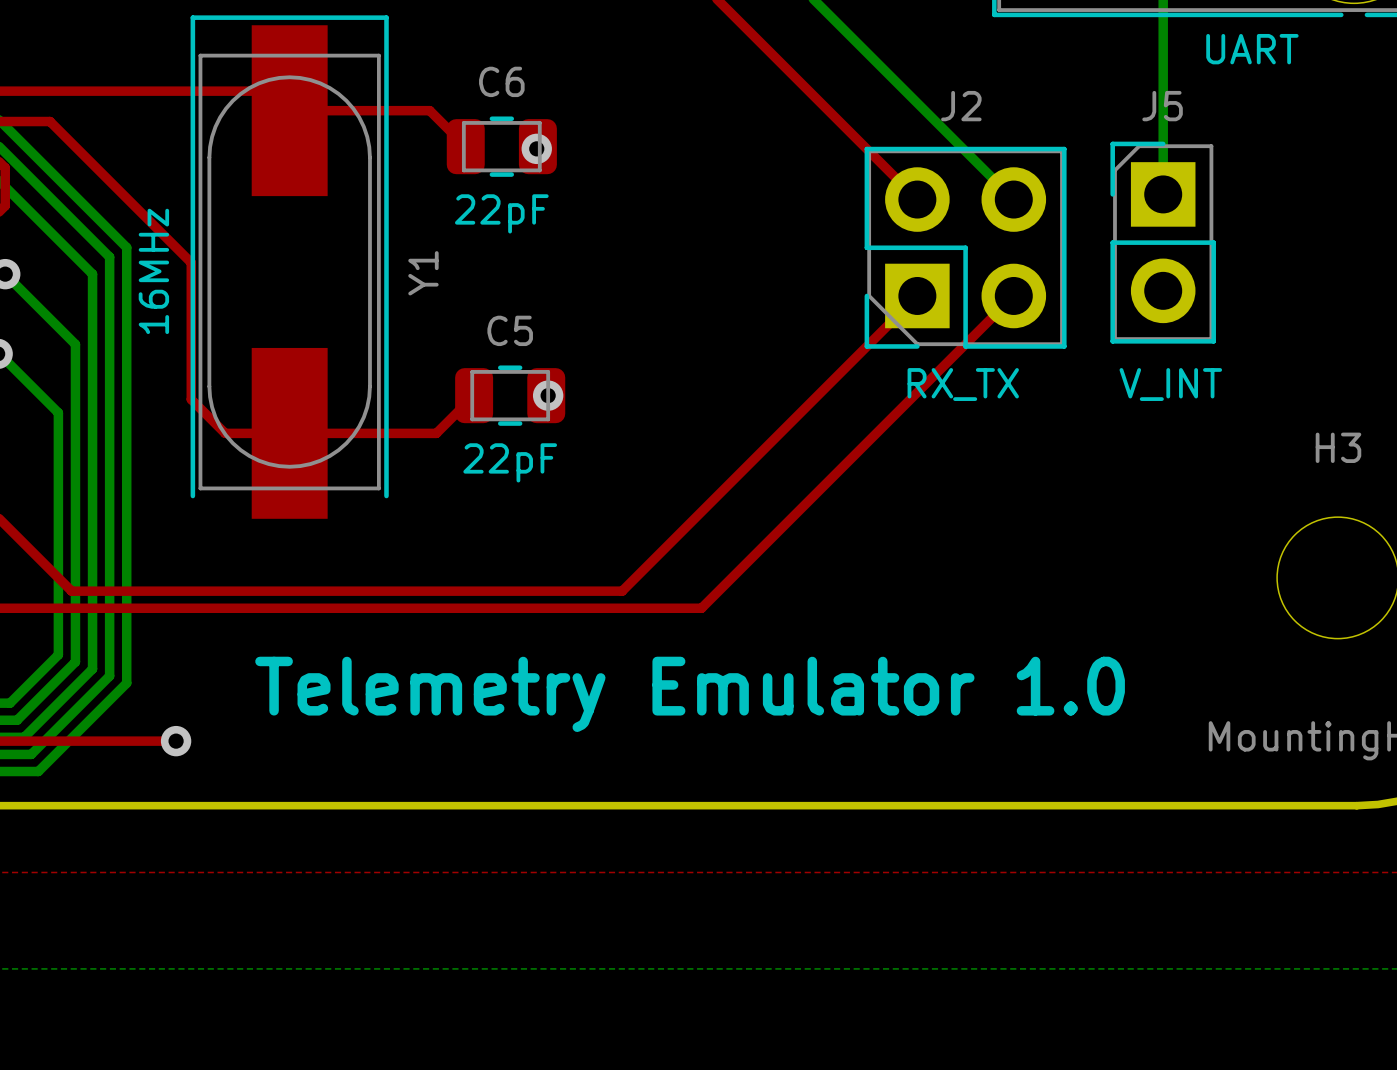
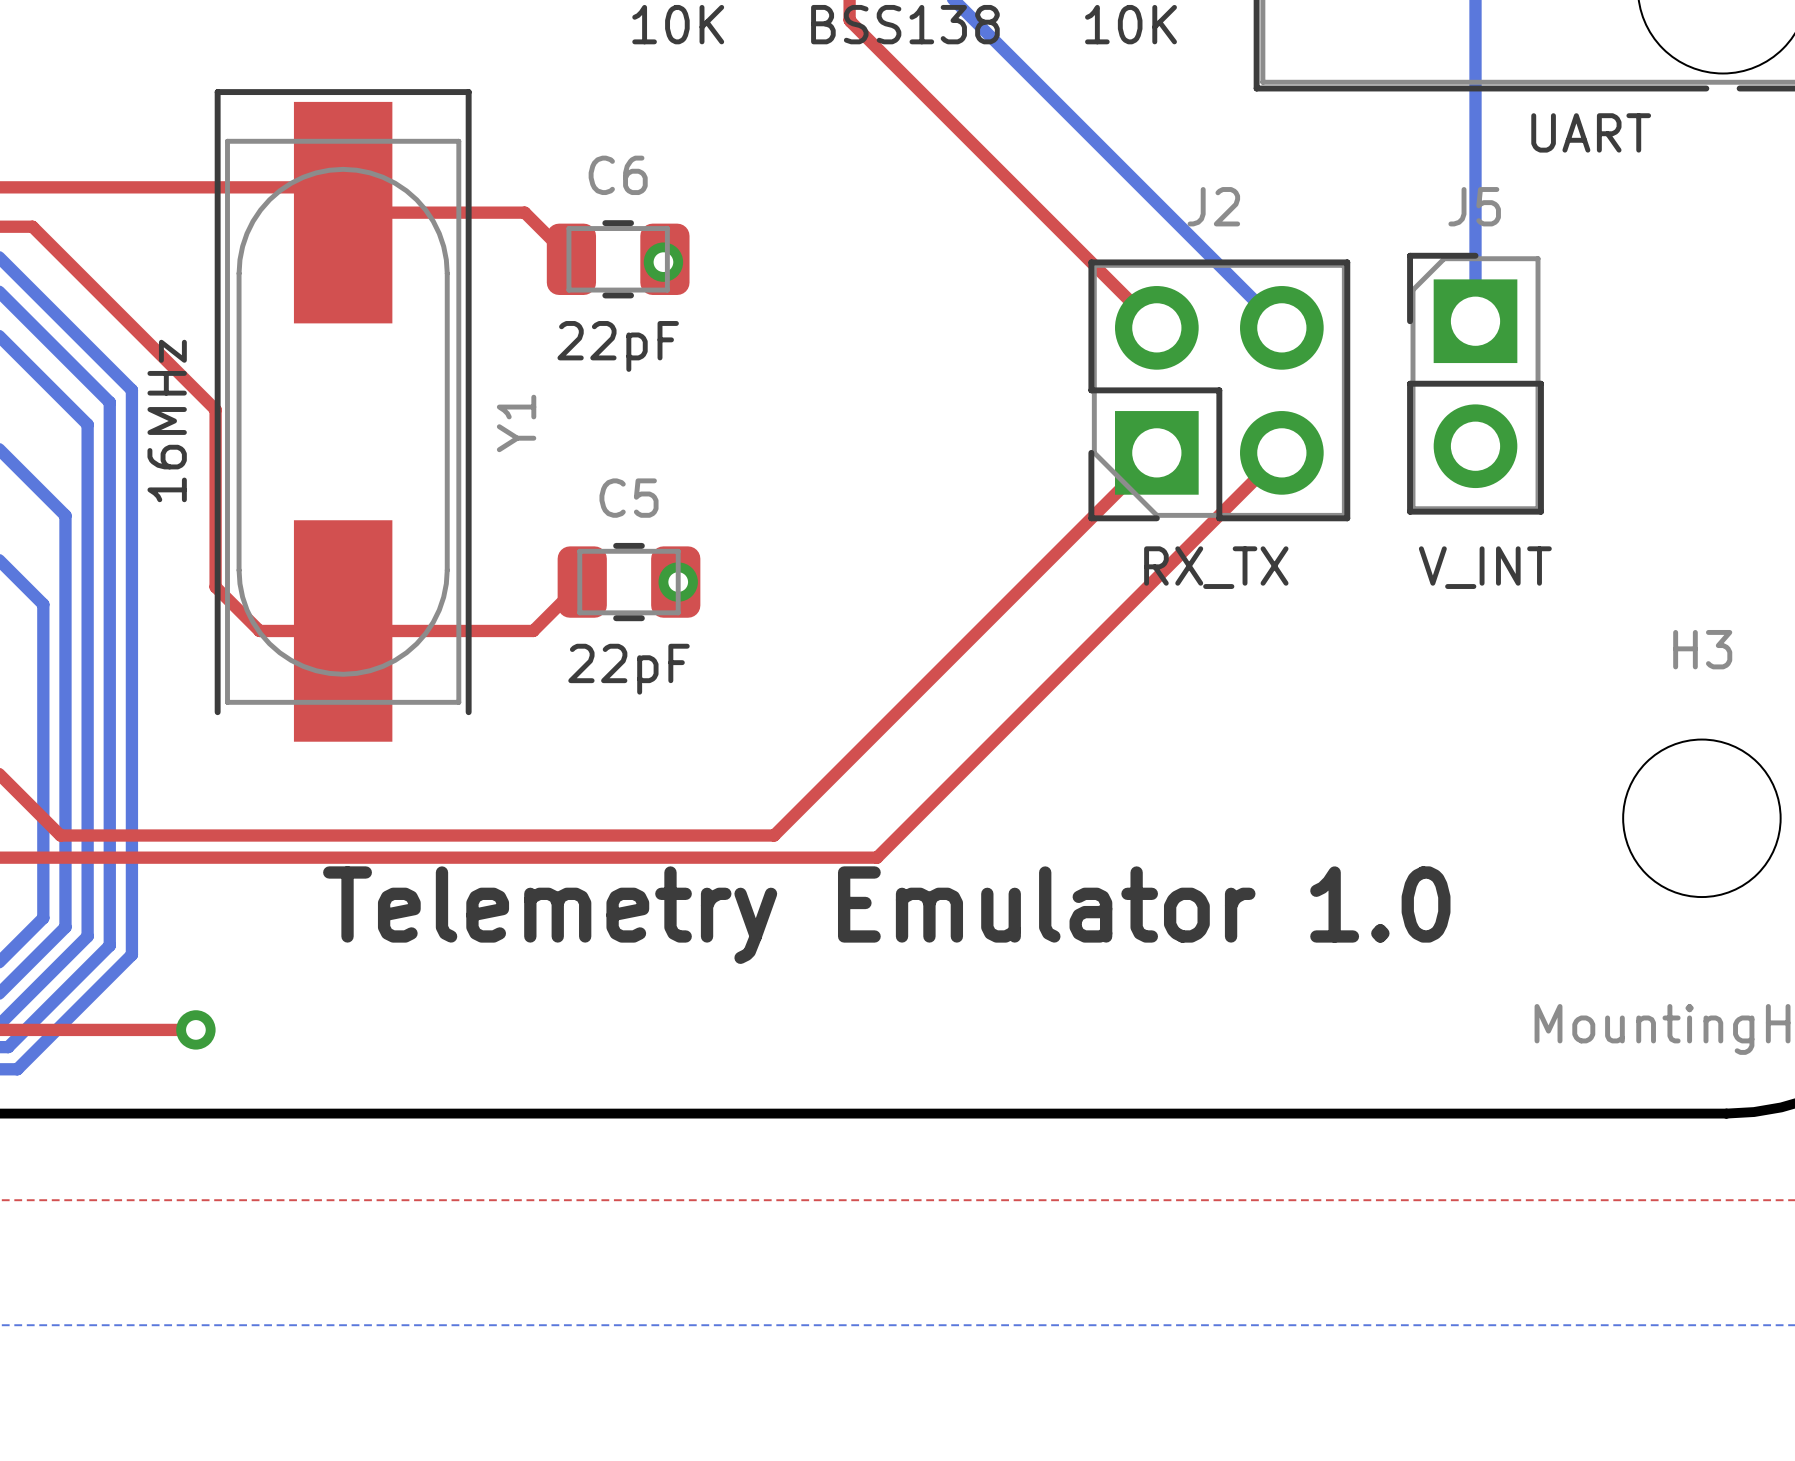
text position: Telemetry Emulator 1.0 (690, 694) -> Telemetry Emulator 1.0 (886, 915)

